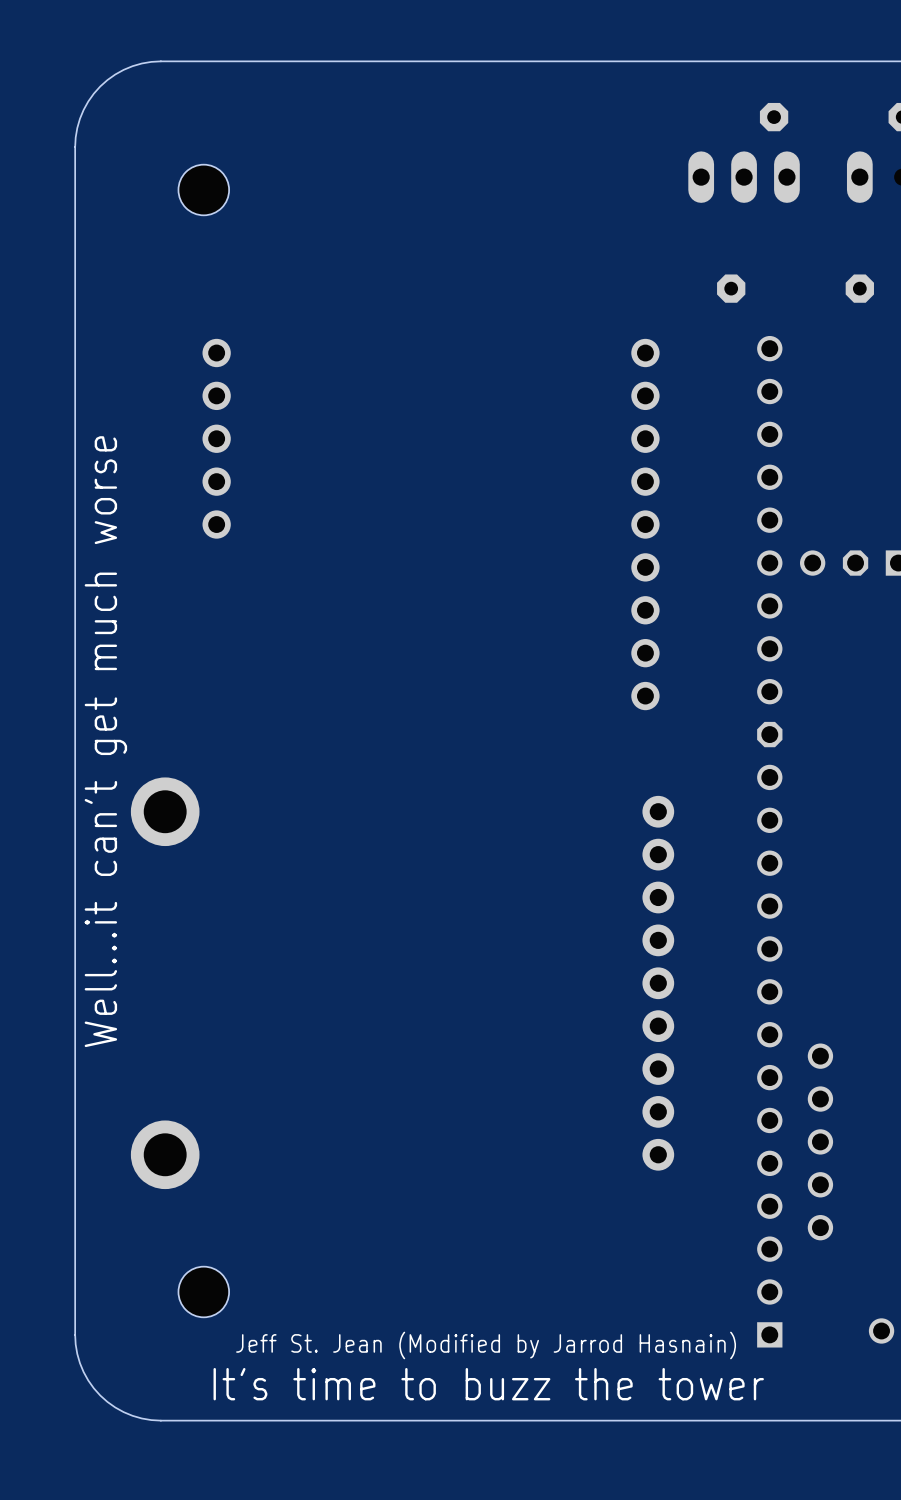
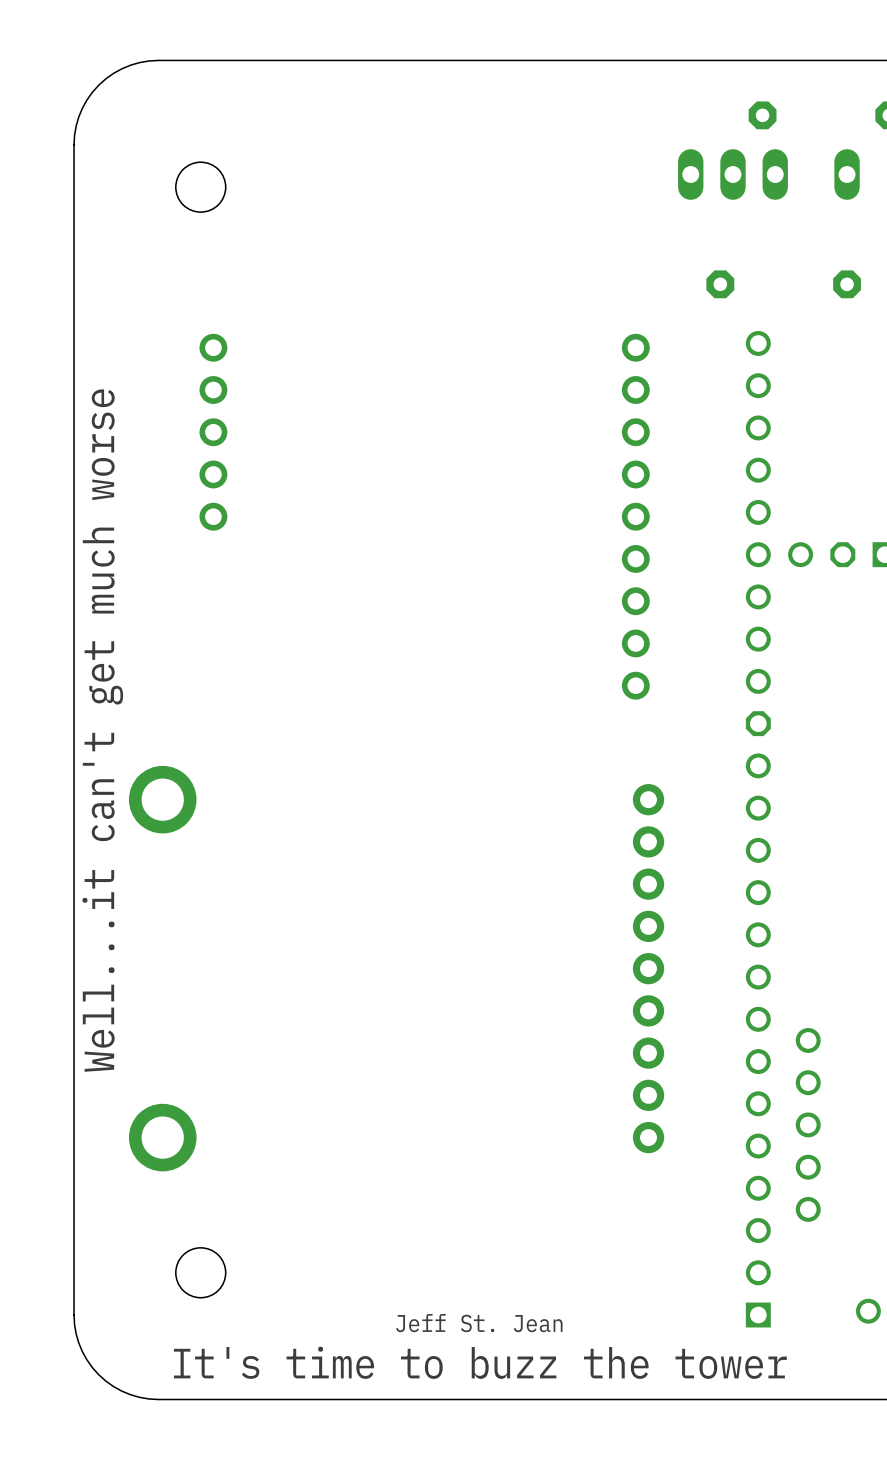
text: Jeff St. Jean (Modified by Jarrod Hasnain) (486, 1345) -> Jeff St. Jean (479, 1323)

